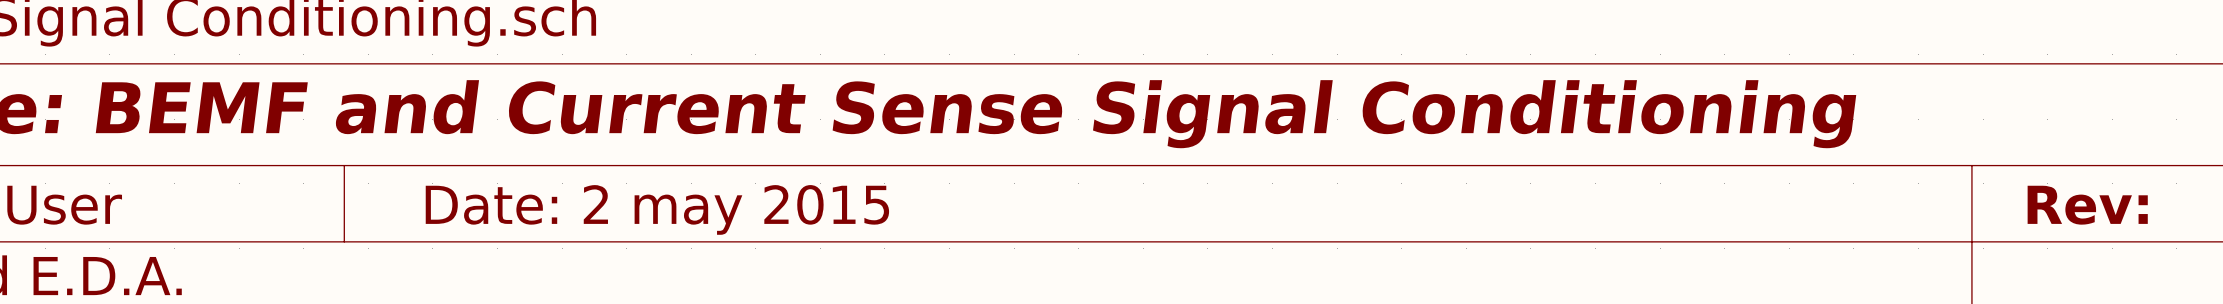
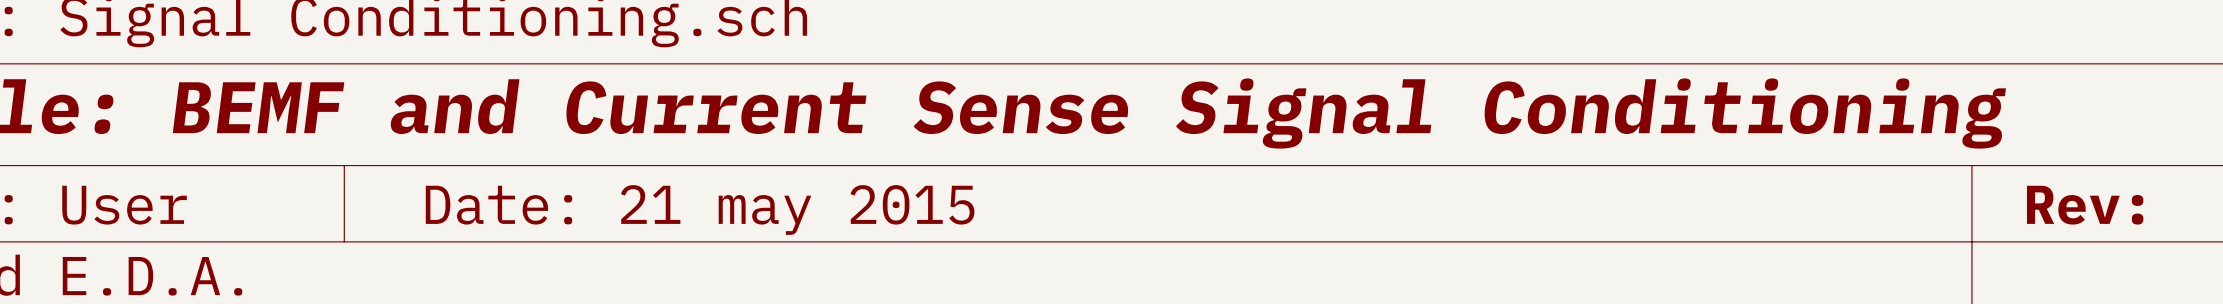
title block: Date: 2 may 2015 (657, 209) -> Date: 21 may 2015 (700, 209)

